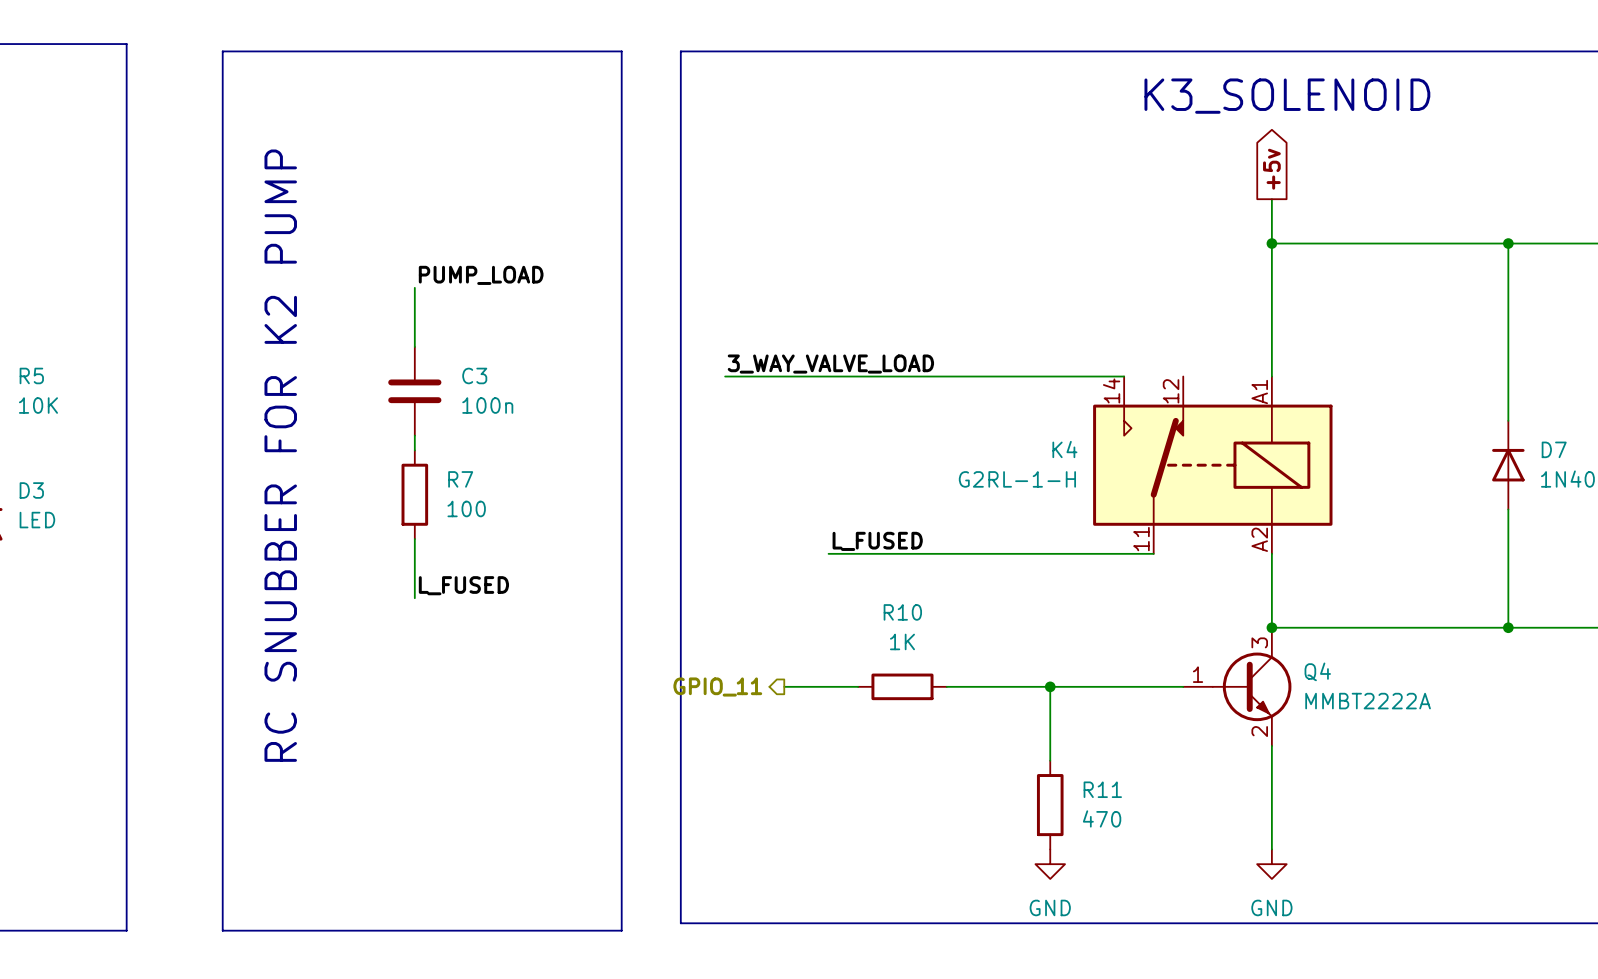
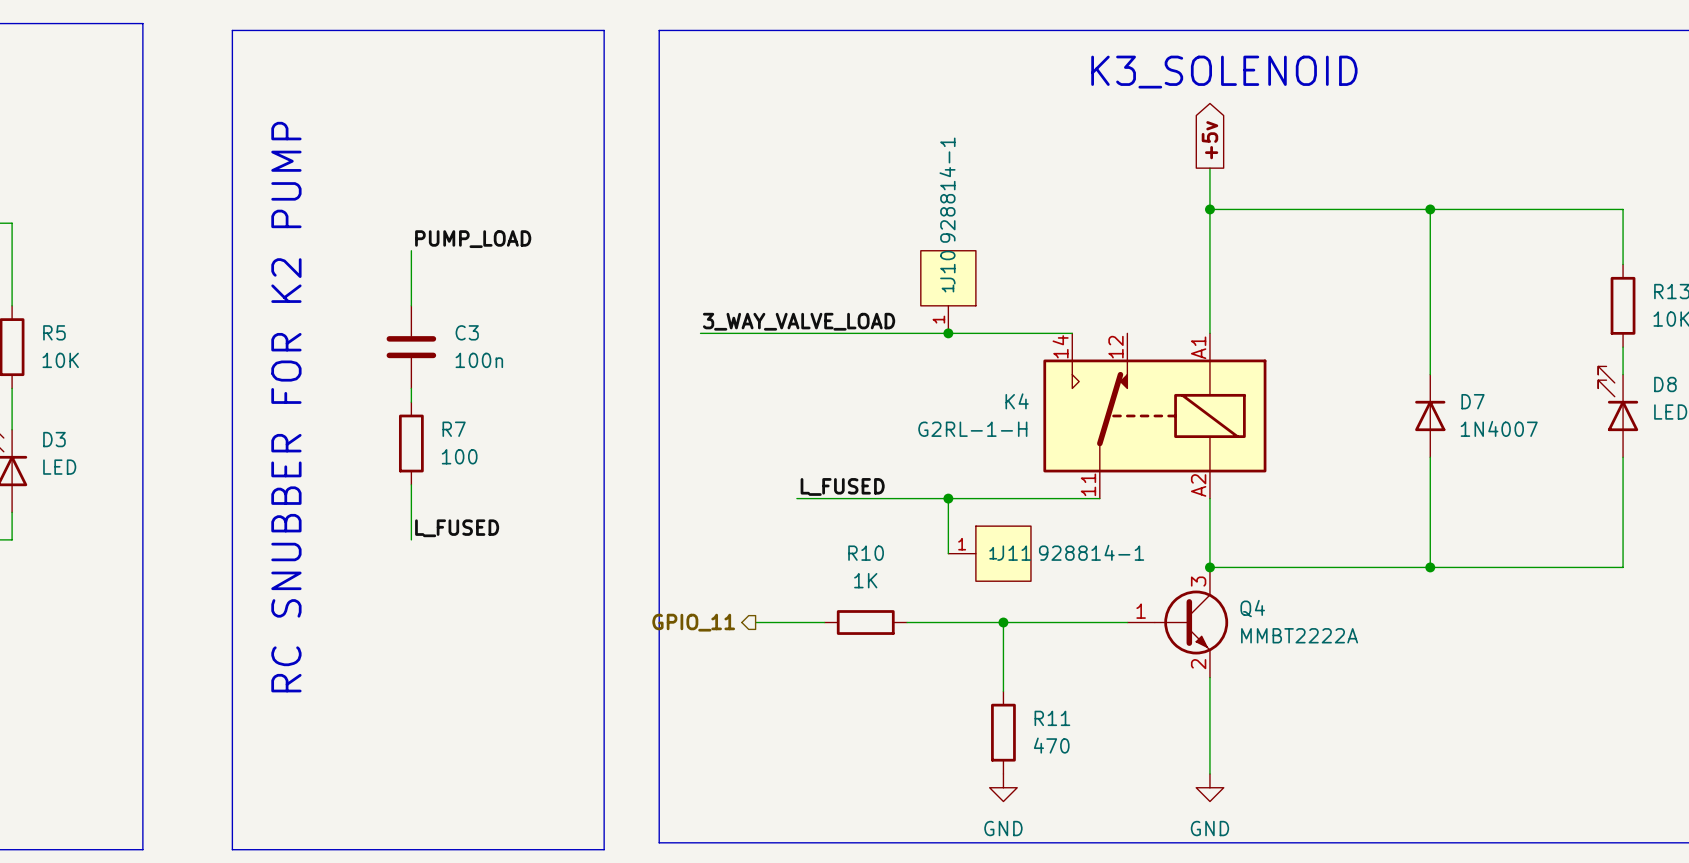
J10: none -> 928814-1 (948, 291)
junction: none -> (948, 333)
wire: none -> (948, 498) (948, 553)
junction: none -> (948, 498)
J11: none -> 928814-1 (990, 553)

